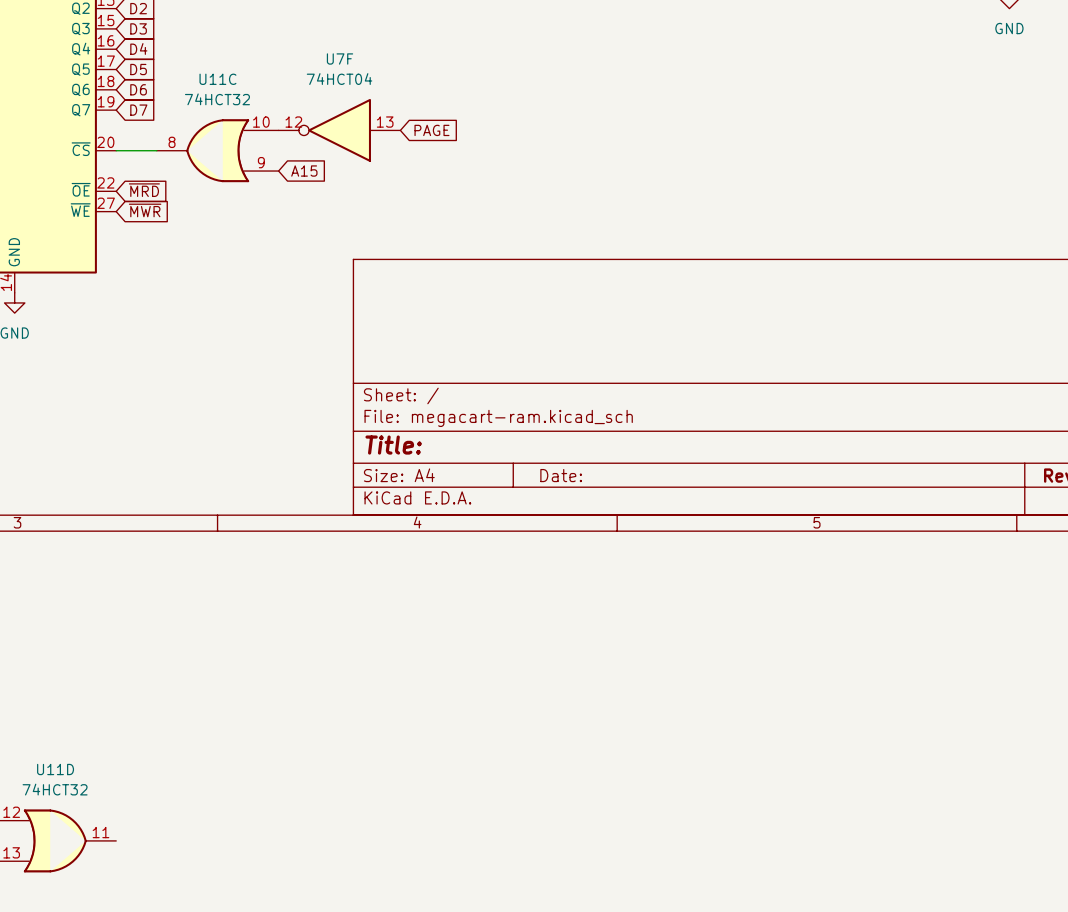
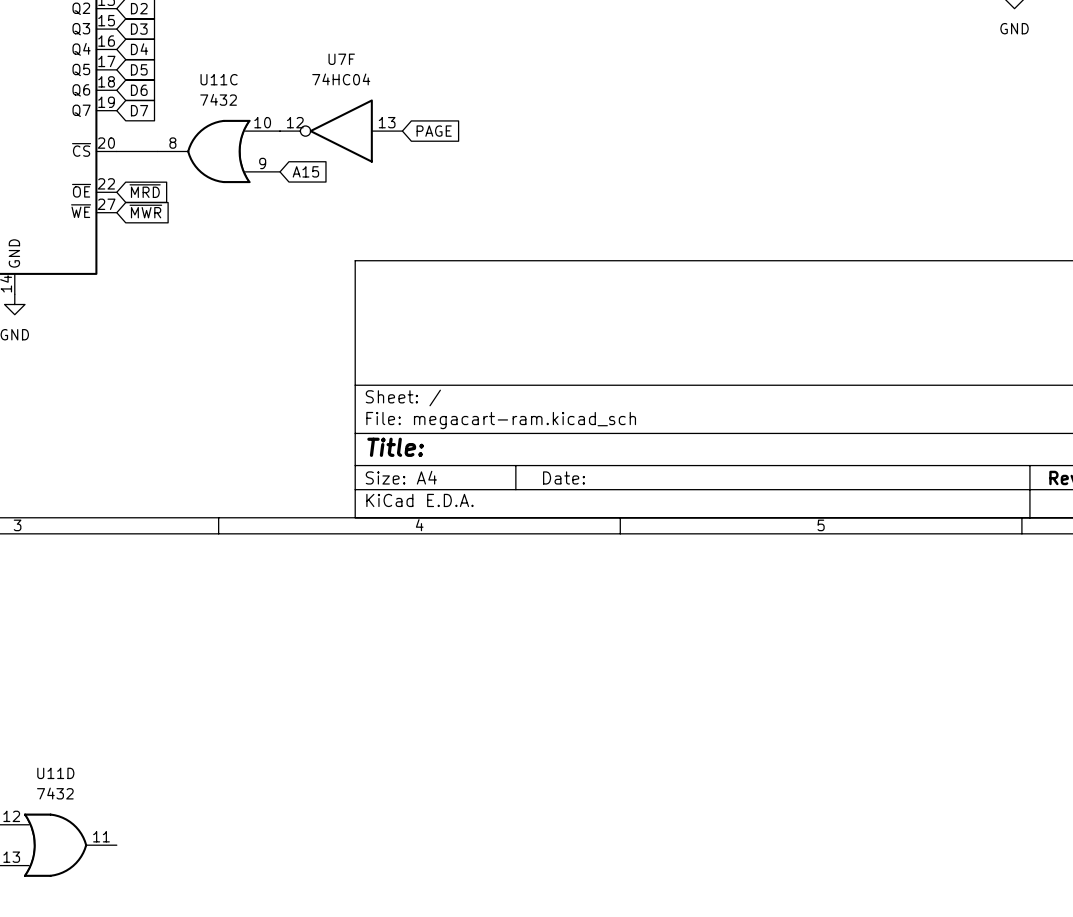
U7F value: 74HCT04 (339, 79) -> 74HC04 (341, 79)
U11C value: 74HCT32 (217, 99) -> 7432 (218, 99)
U11D value: 74HCT32 (55, 789) -> 7432 (55, 793)

